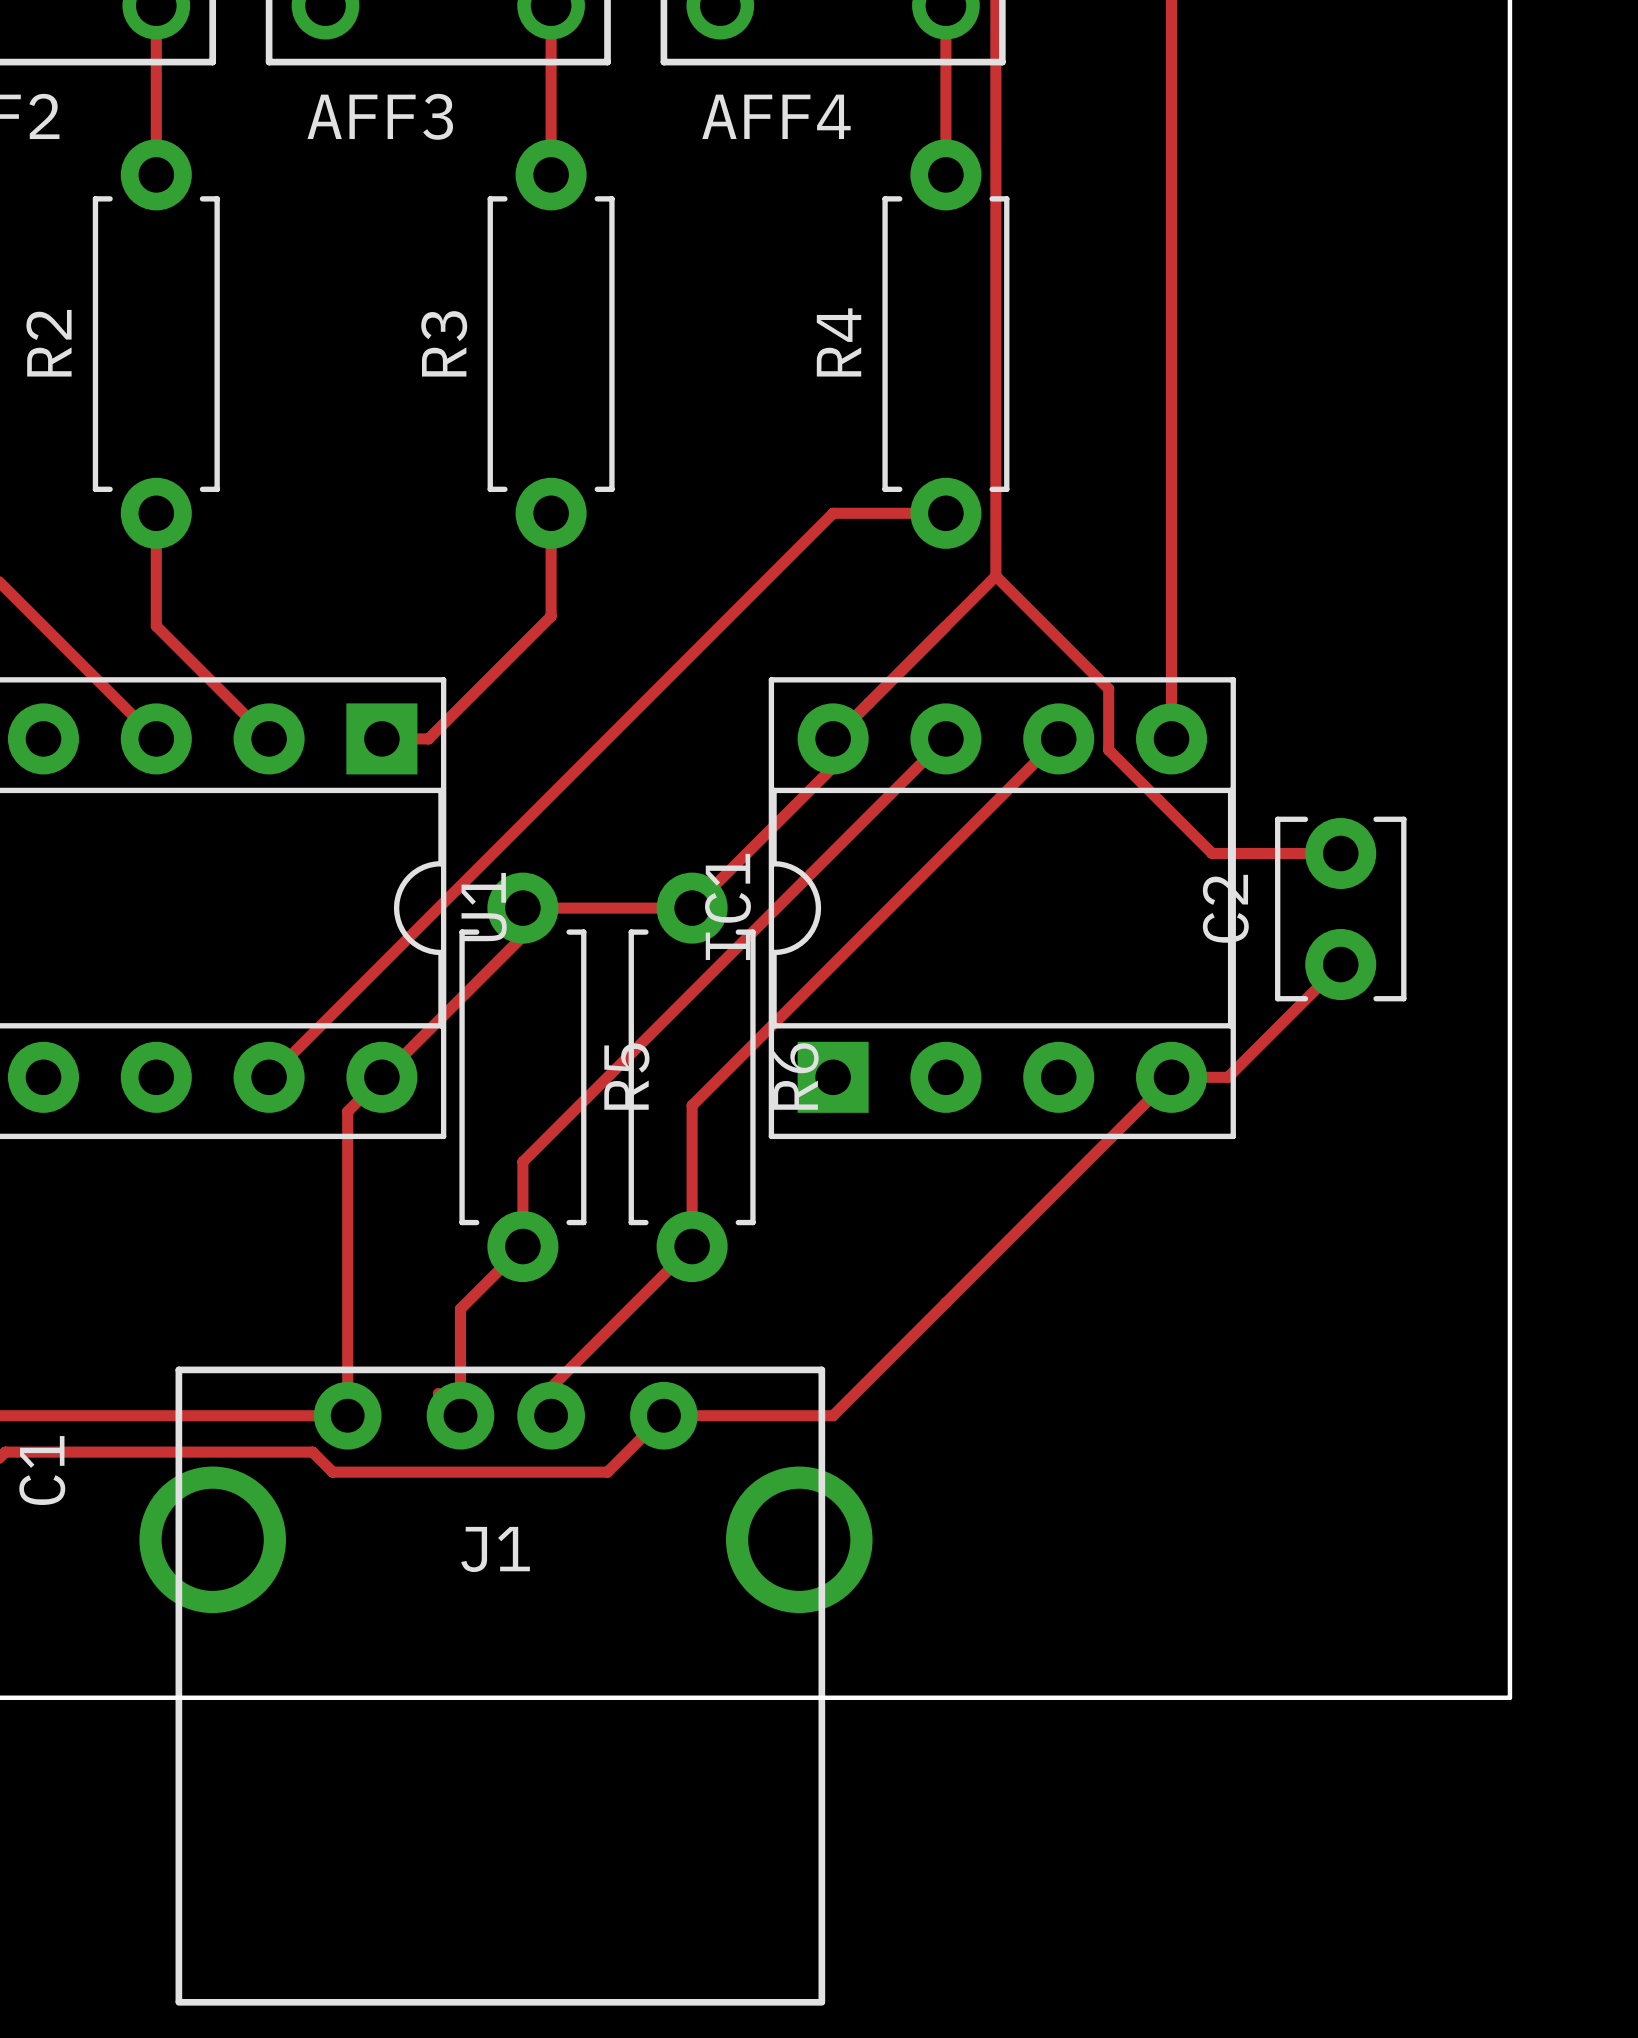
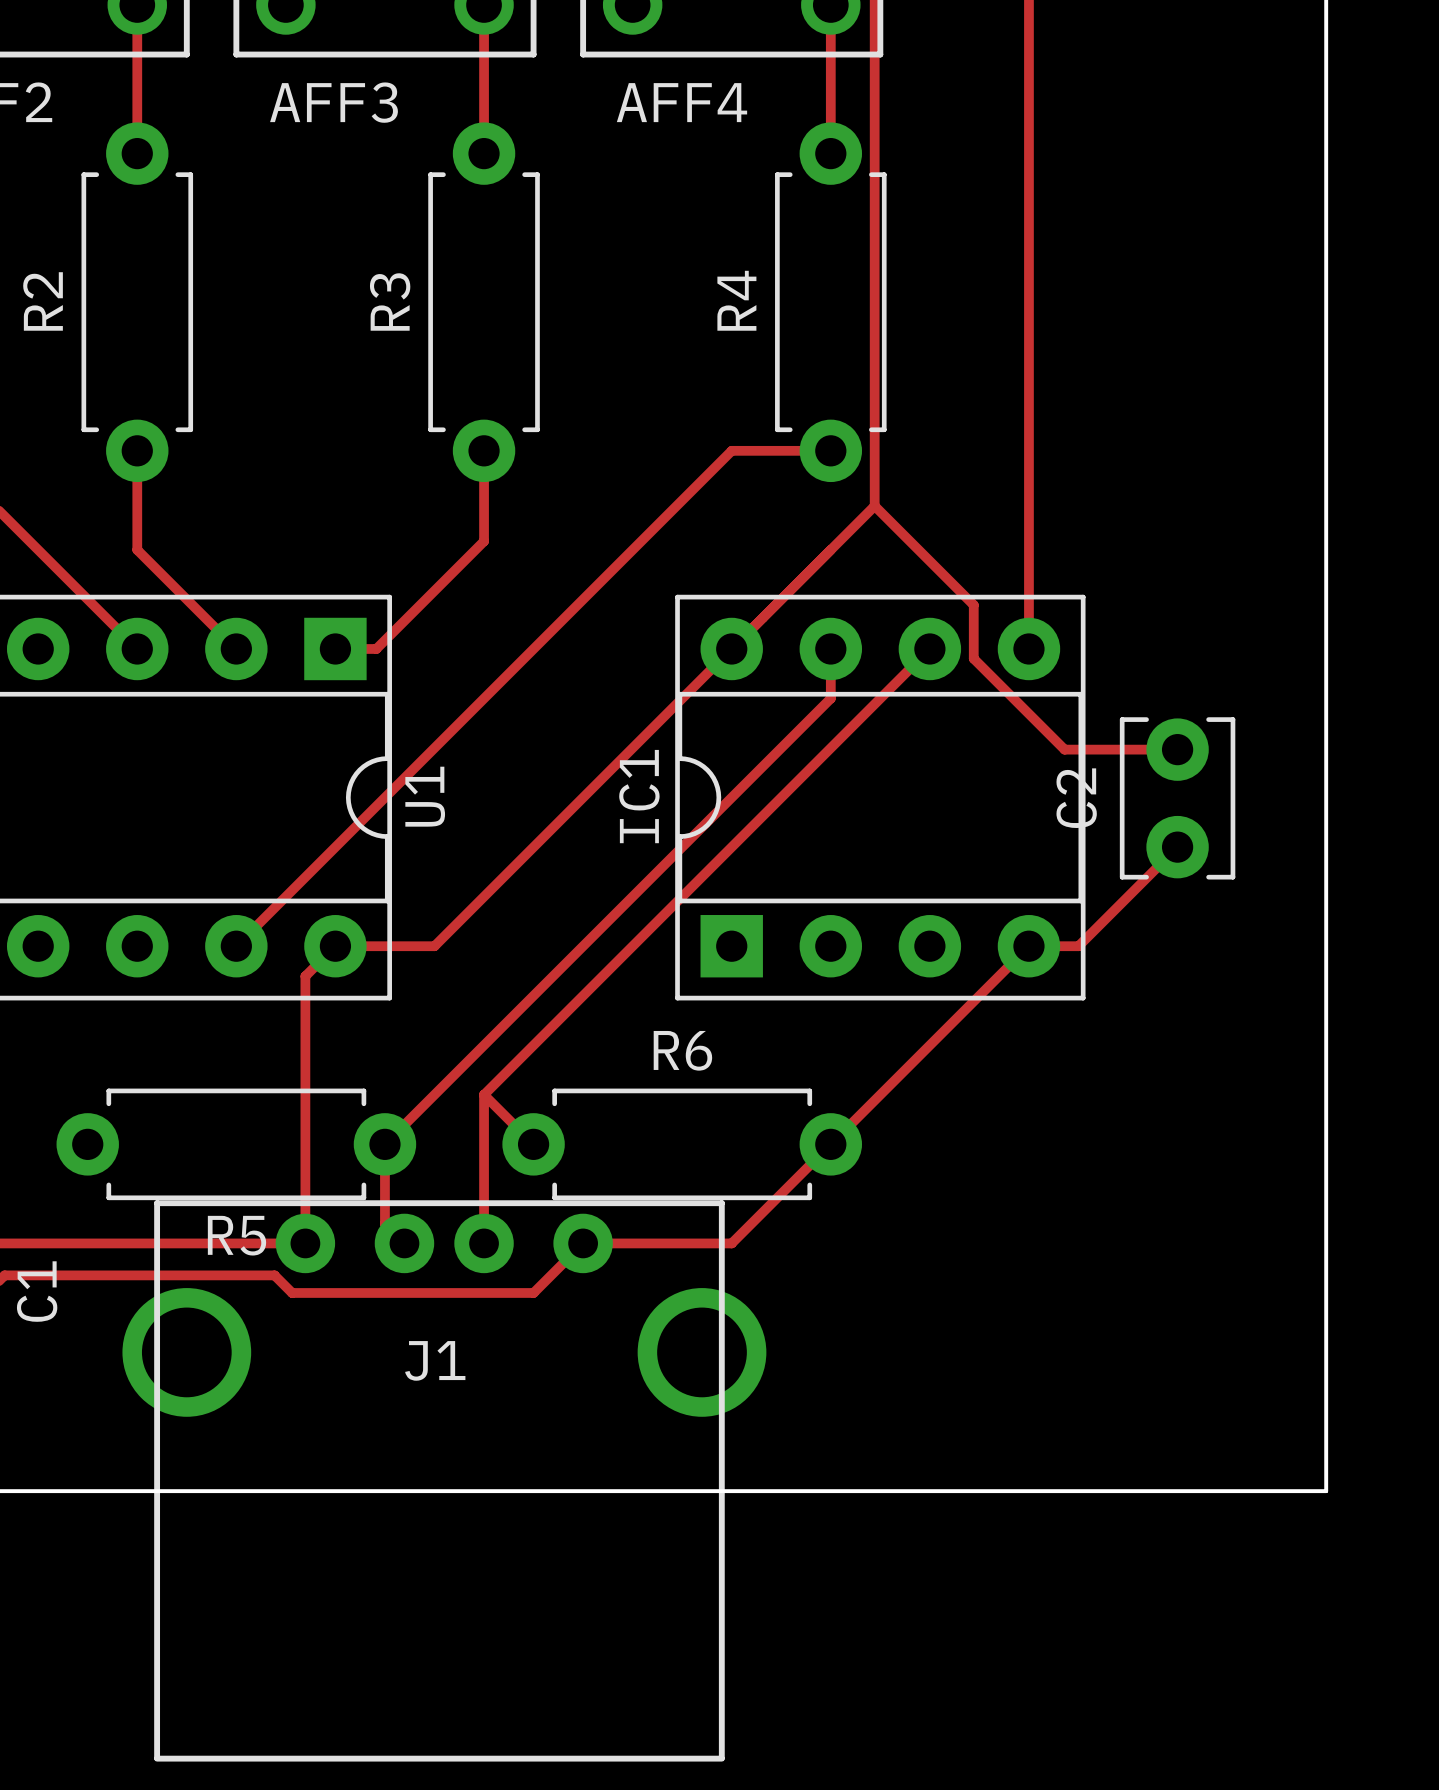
track: (833, 738) (833, 767) (692, 908) (522, 908) (522, 936) (381, 1077) -> (731, 648) (434, 946) (335, 946)
track: (945, 738) (522, 1161) (522, 1246) (460, 1308) (460, 1415) -> (830, 648) (830, 698) (384, 1144) (384, 1223)
R6 name position: R6 (796, 1076) -> R6 (682, 1050)
R5 rotation: 0° (522, 1077) -> 90° clockwise (236, 1144)
R5 position: (522, 1077) -> (236, 1144)
R6 rotation: 0° (692, 1077) -> 90° clockwise (682, 1144)
track: (692, 1105) (692, 1246) (551, 1387) -> (607, 970) (484, 1094)
track: none -> (484, 1094) (533, 1144)
track: none -> (484, 1094) (484, 1218)

